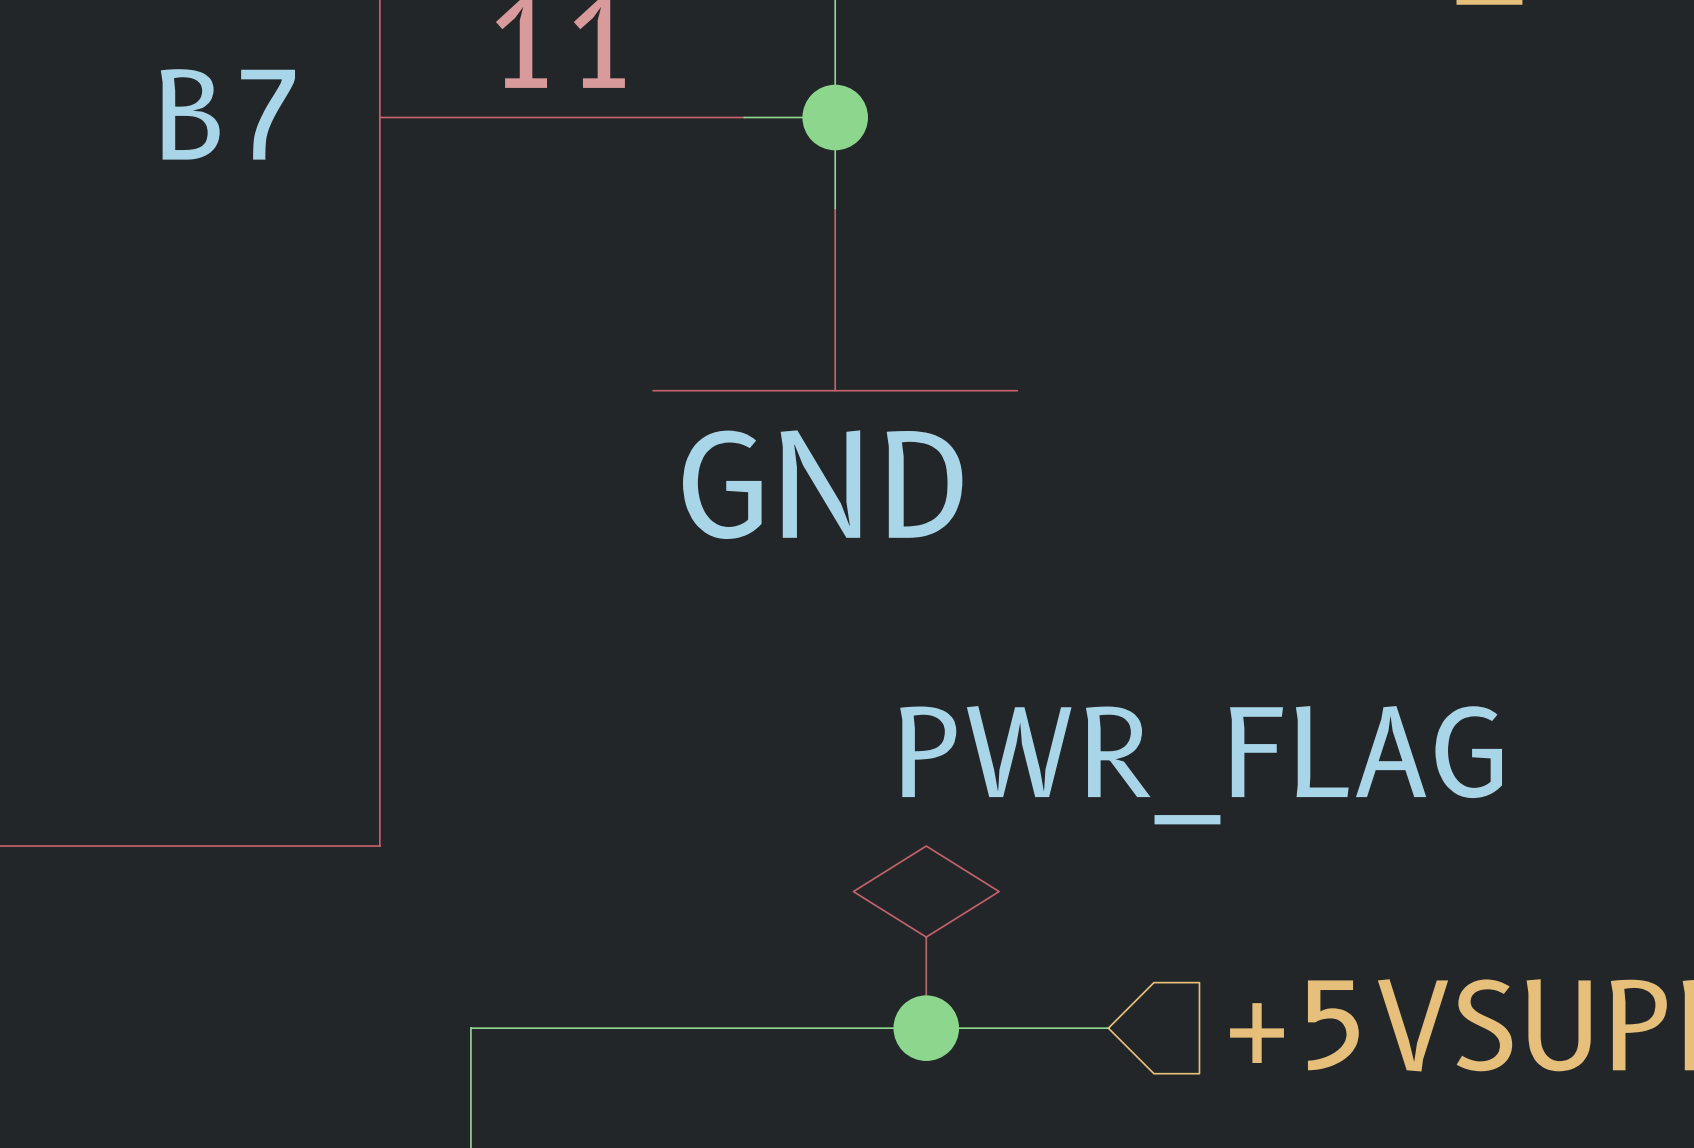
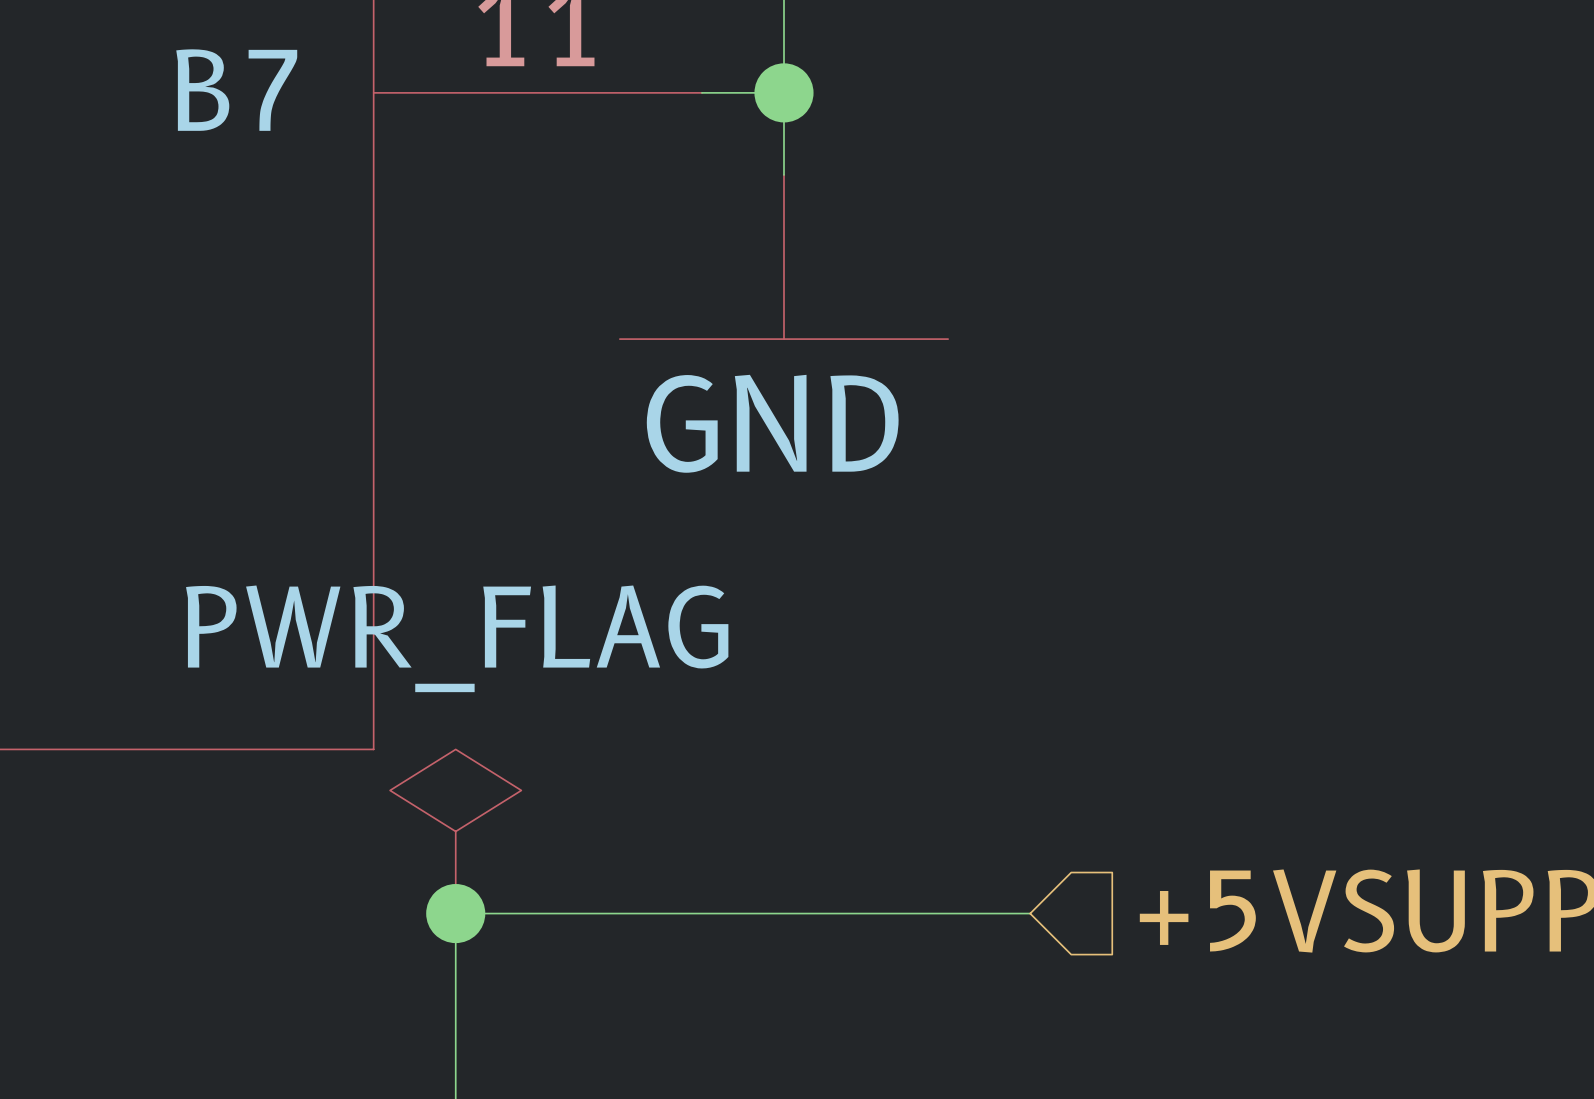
power symbol text position: PWR_FLAG (1201, 765) -> PWR_FLAG (457, 638)
power symbol position: PWR_FLAG (926, 937) -> PWR_FLAG (455, 831)
junction: none -> (455, 913)
junction: (926, 1028) -> none

